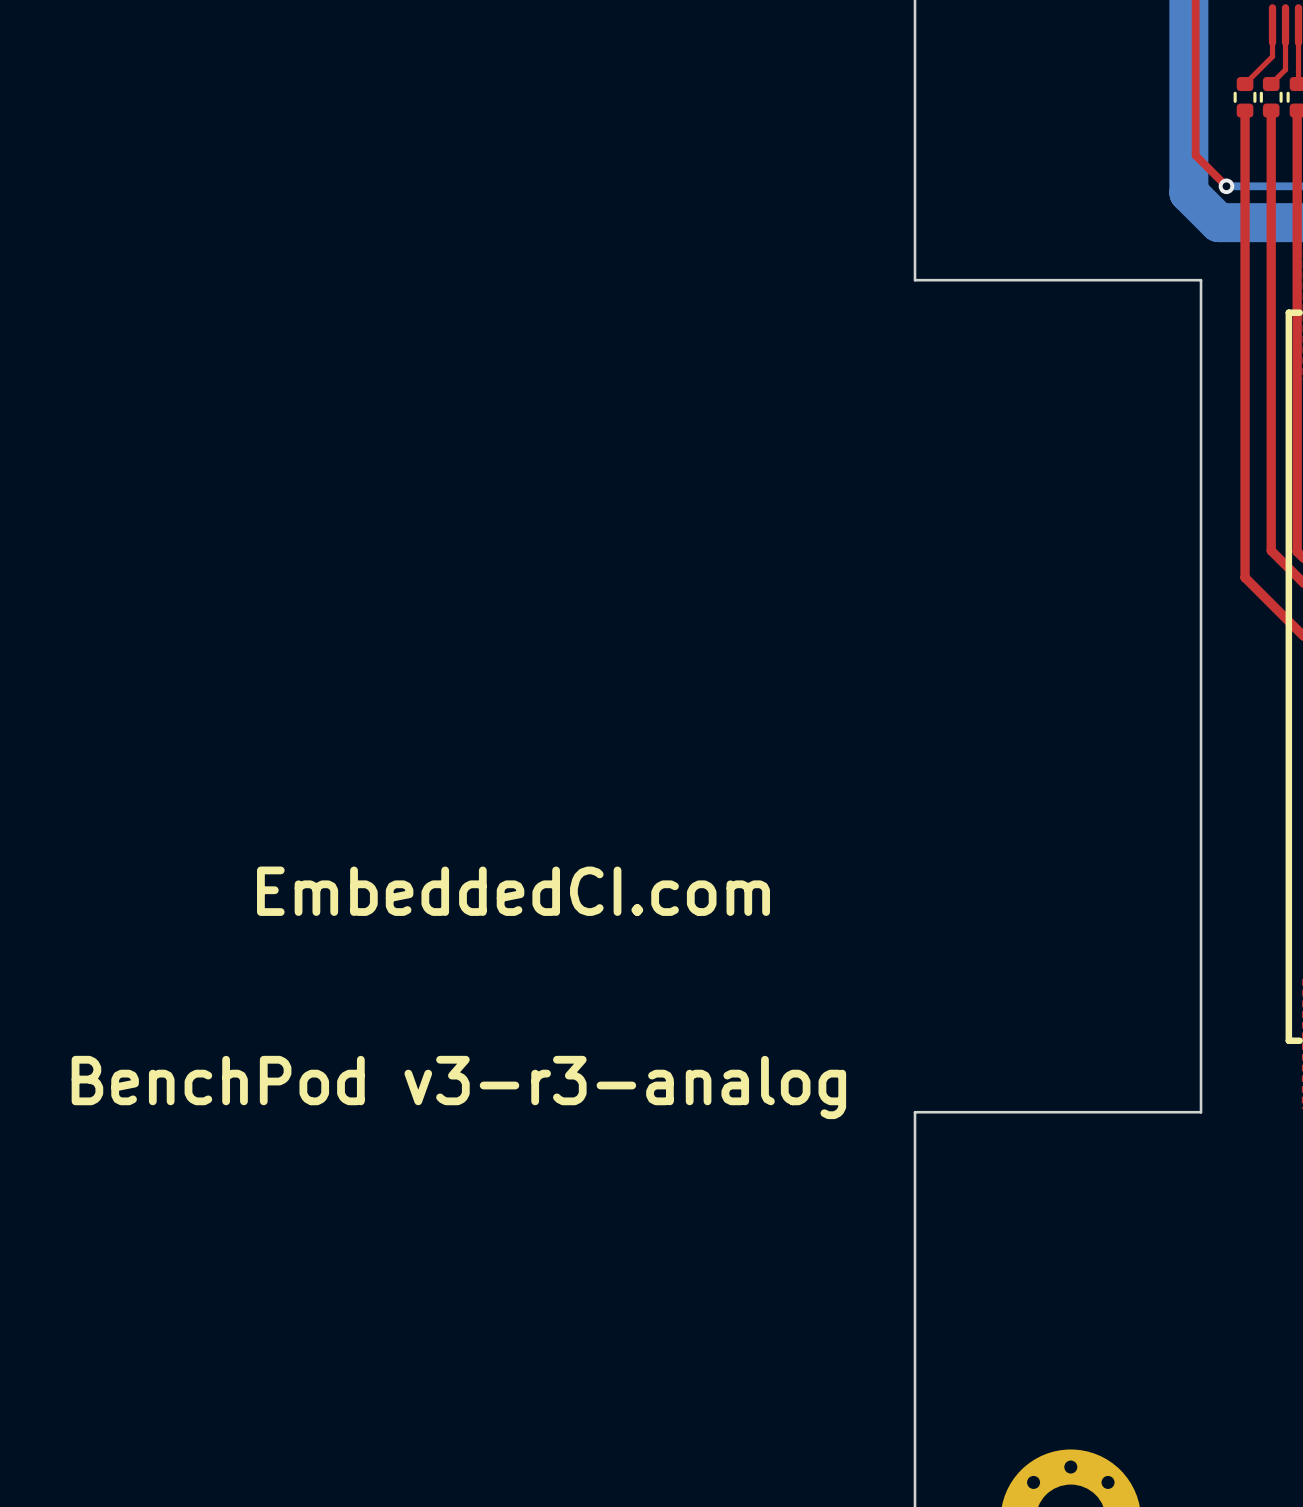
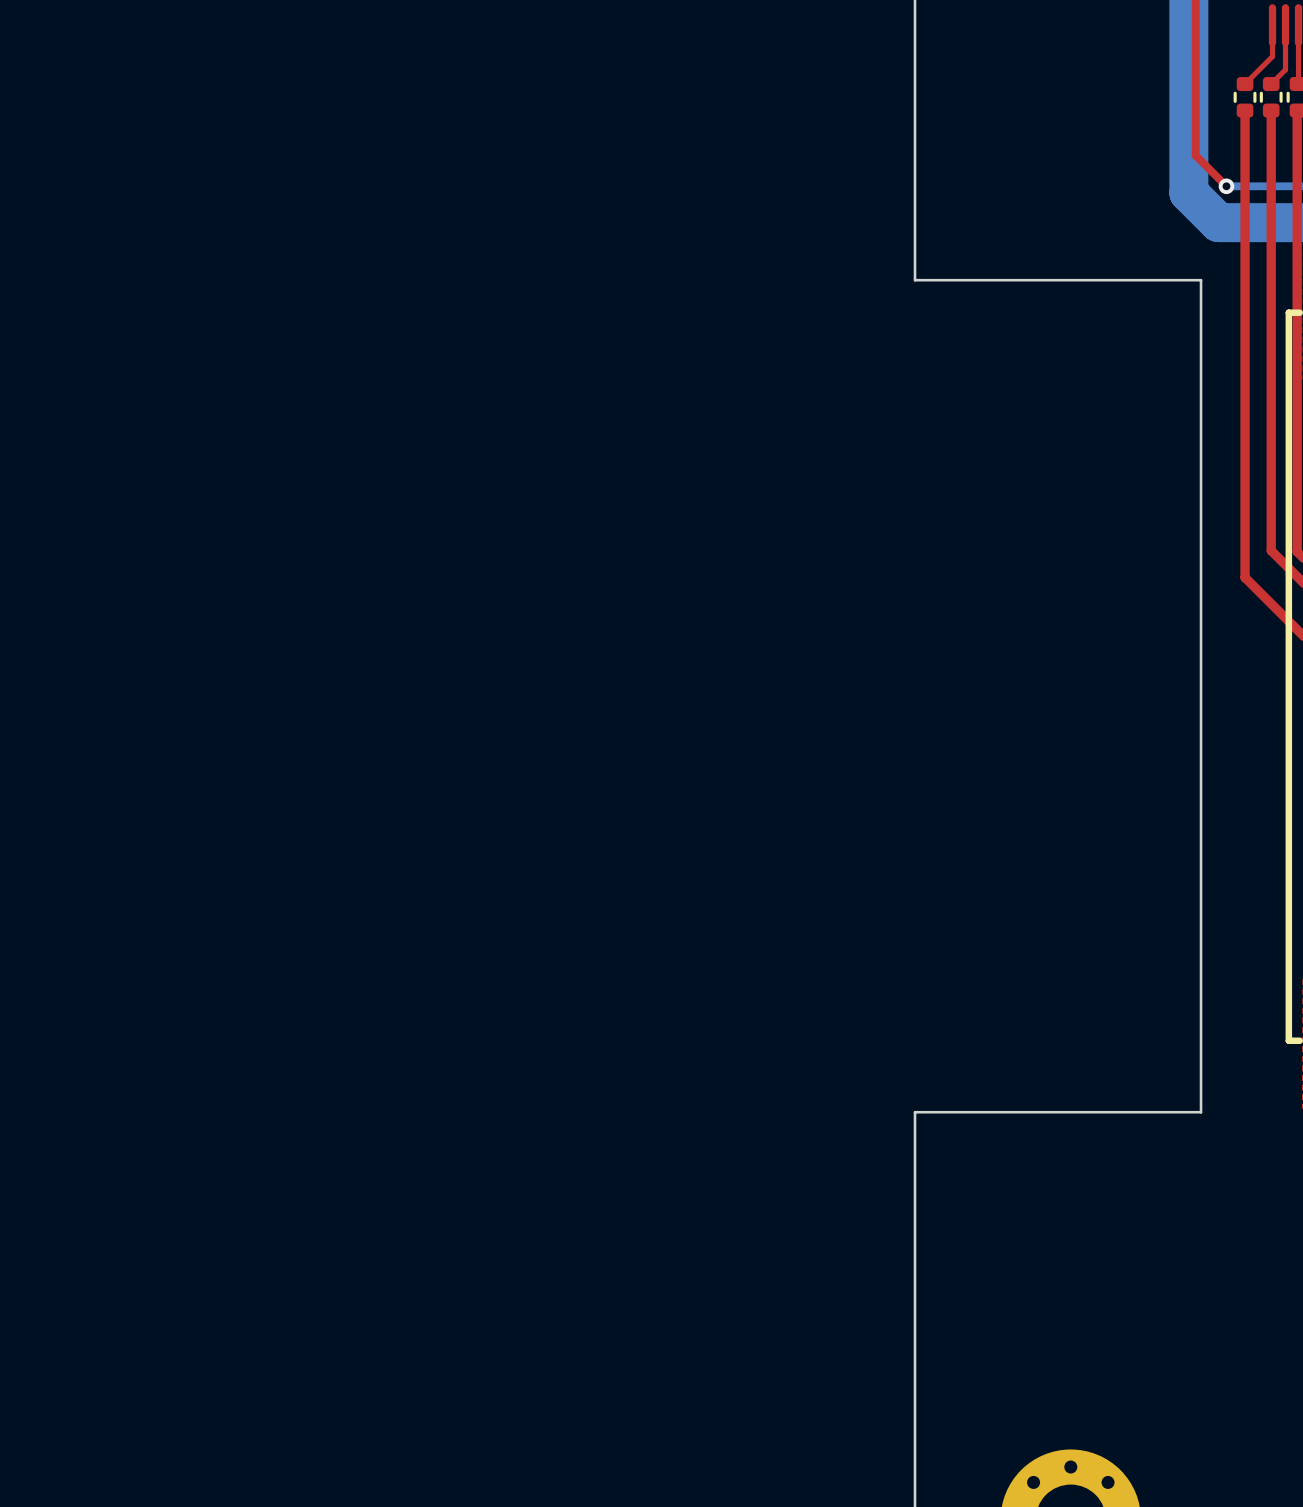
text: EmbeddedCI.com (513, 891) -> none
text: BenchPod v3-r3-analog (458, 1087) -> none

